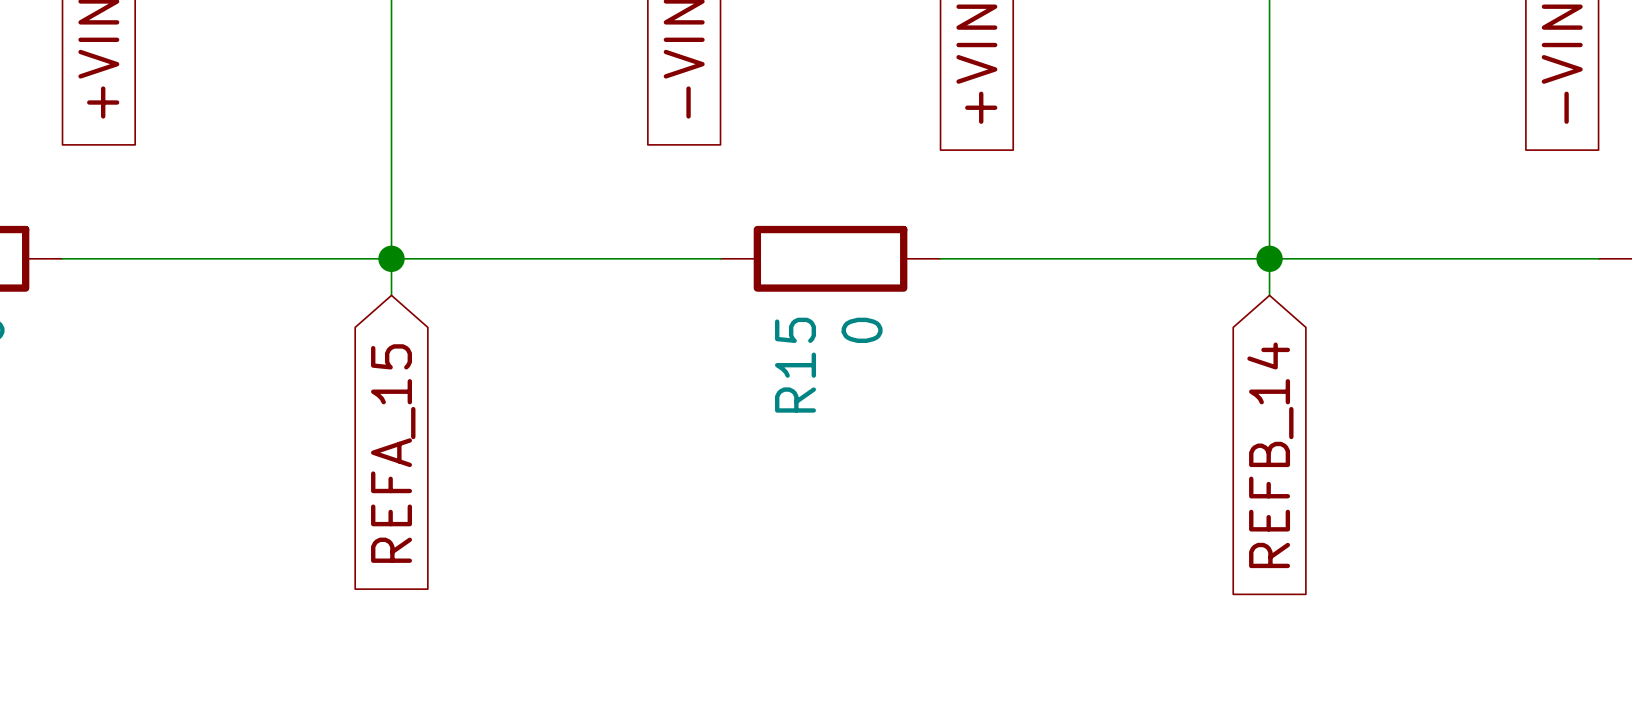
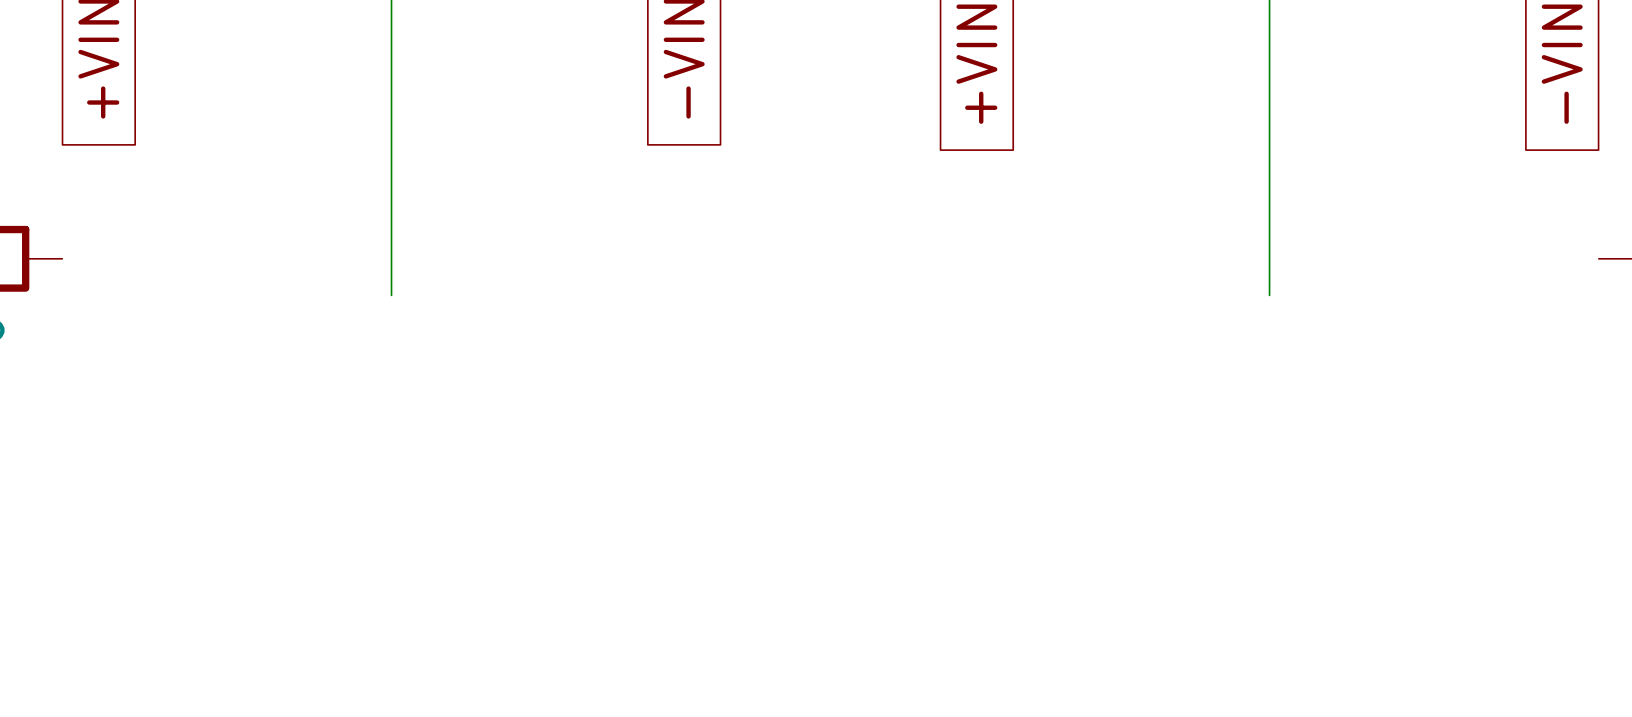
wire: (62, 258) (720, 258) -> none
junction: (391, 258) -> none
R15: 0 (830, 258) -> none
wire: (940, 258) (1598, 258) -> none
junction: (1269, 258) -> none
global label: REFA_15 (393, 453) -> none
global label: REFB_14 (1270, 455) -> none

